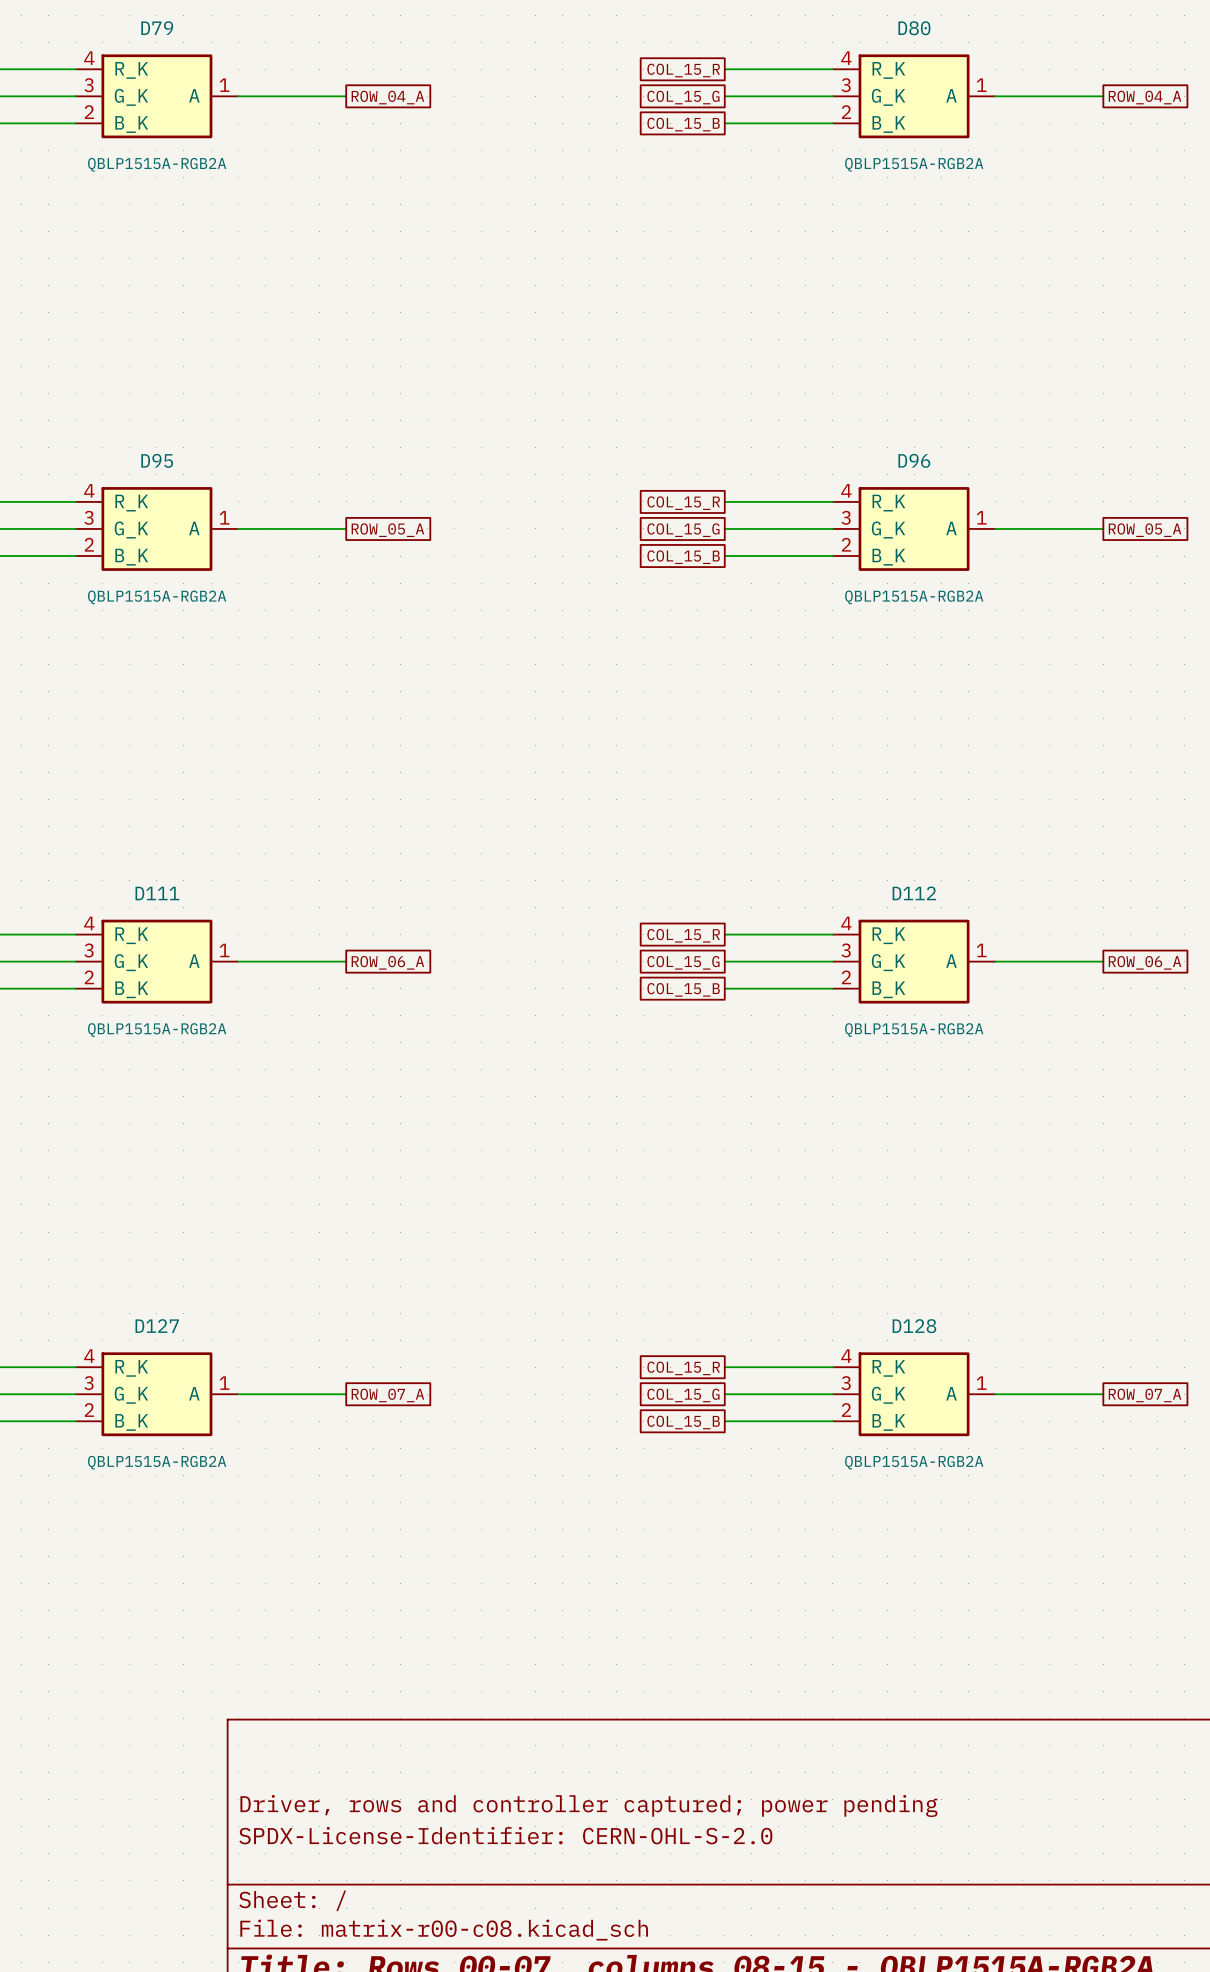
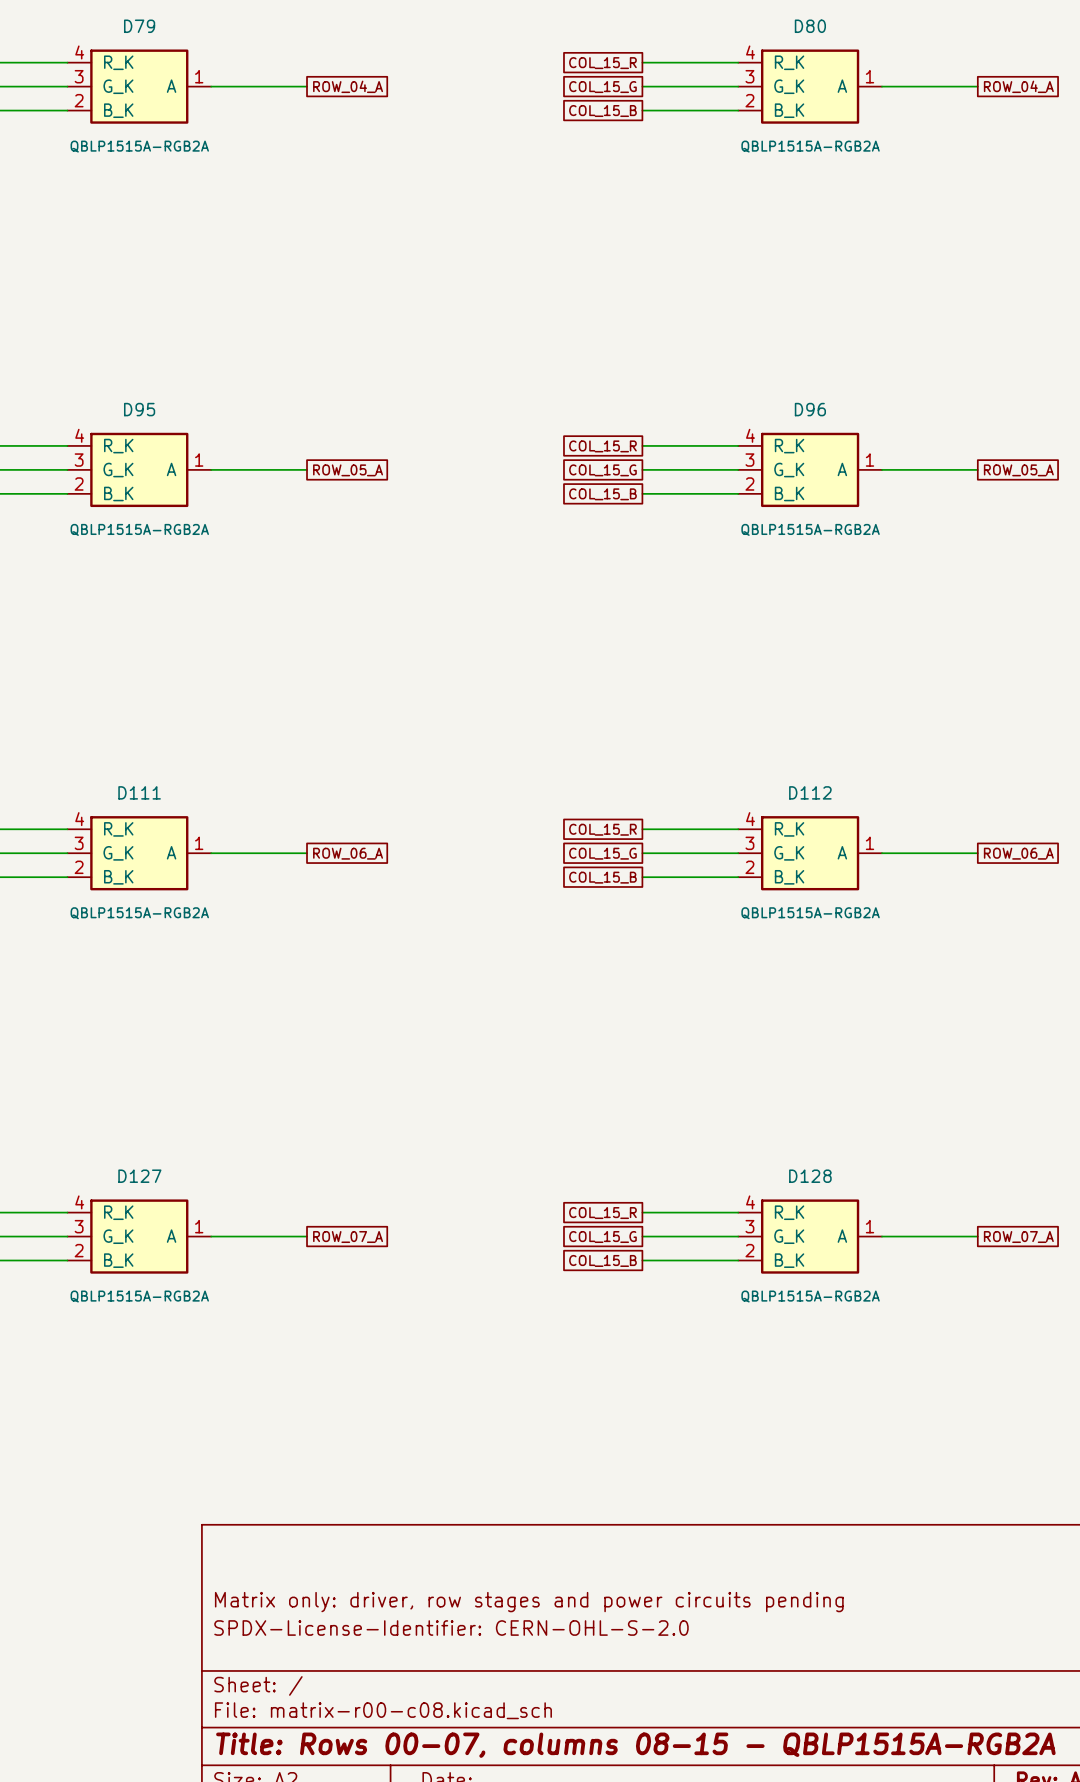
title block: Driver, rows and controller captured; power pending (588, 1806) -> Matrix only: driver, row stages and power circuits pending (529, 1602)

